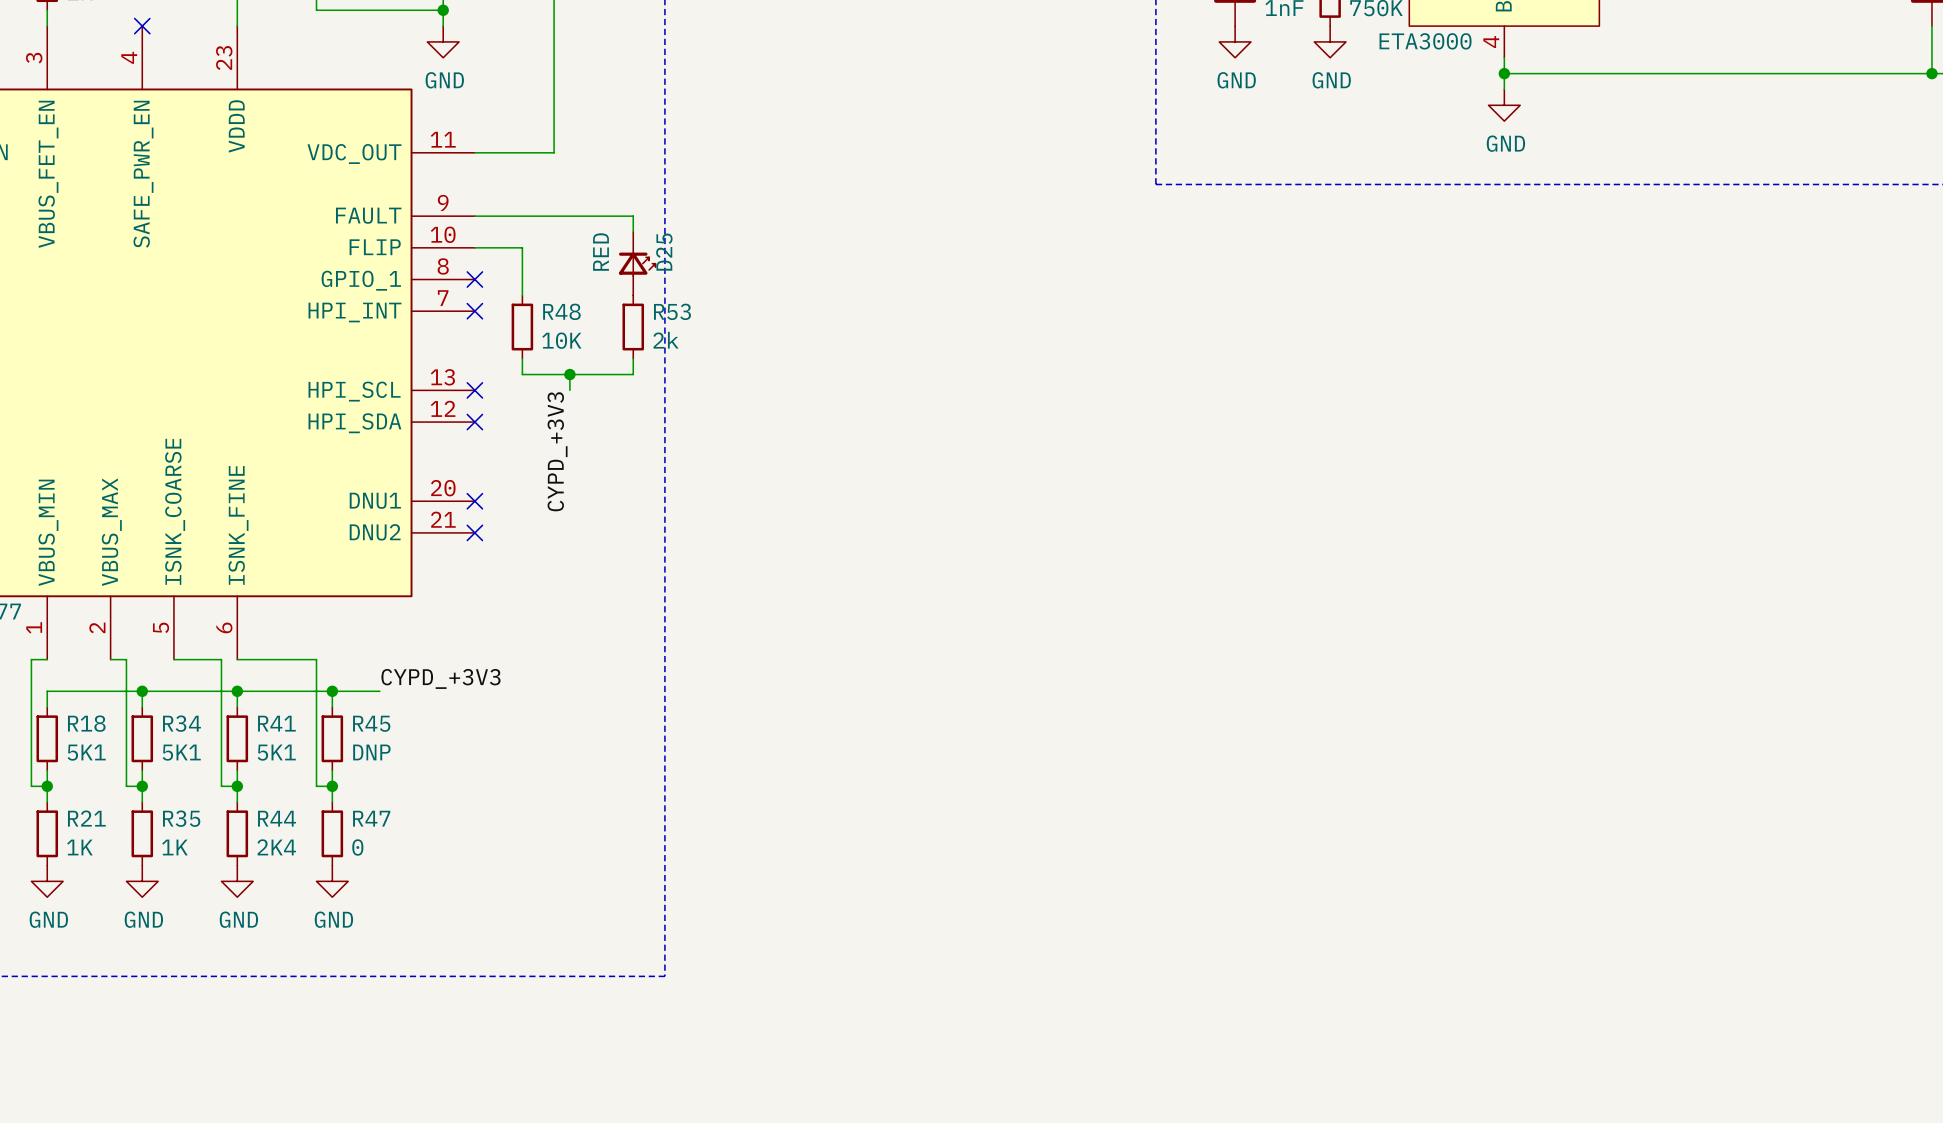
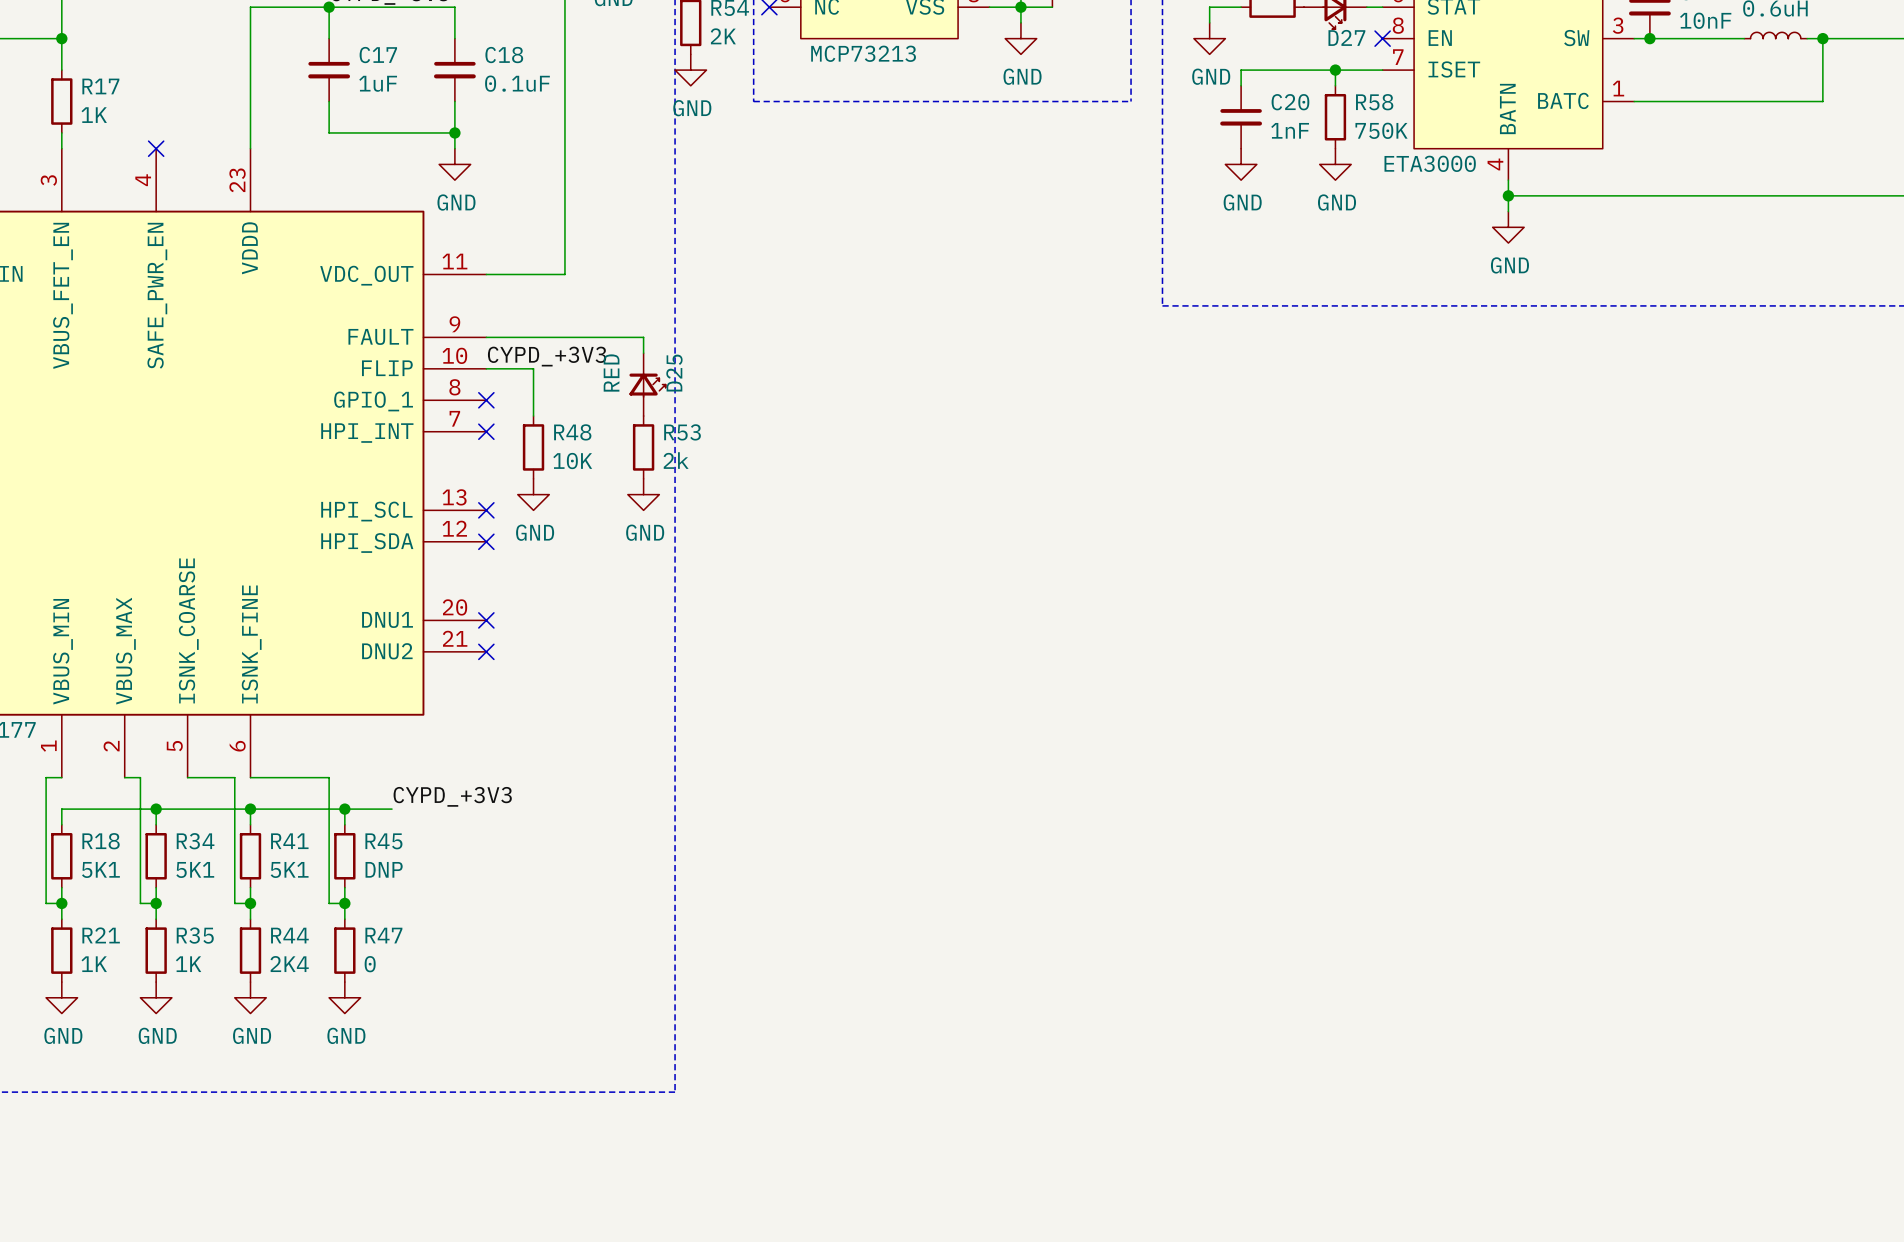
wire: (522, 358) (522, 374) (633, 374) (633, 358) -> none
power symbol: none -> GND (533, 494)
wire: (569, 374) (569, 390) -> none
junction: (569, 374) -> none
power symbol: none -> GND (643, 494)
label rotation: 0° (557, 451) -> 90° clockwise (547, 356)
label position: CYPD_+3V3 (557, 451) -> CYPD_+3V3 (547, 356)

